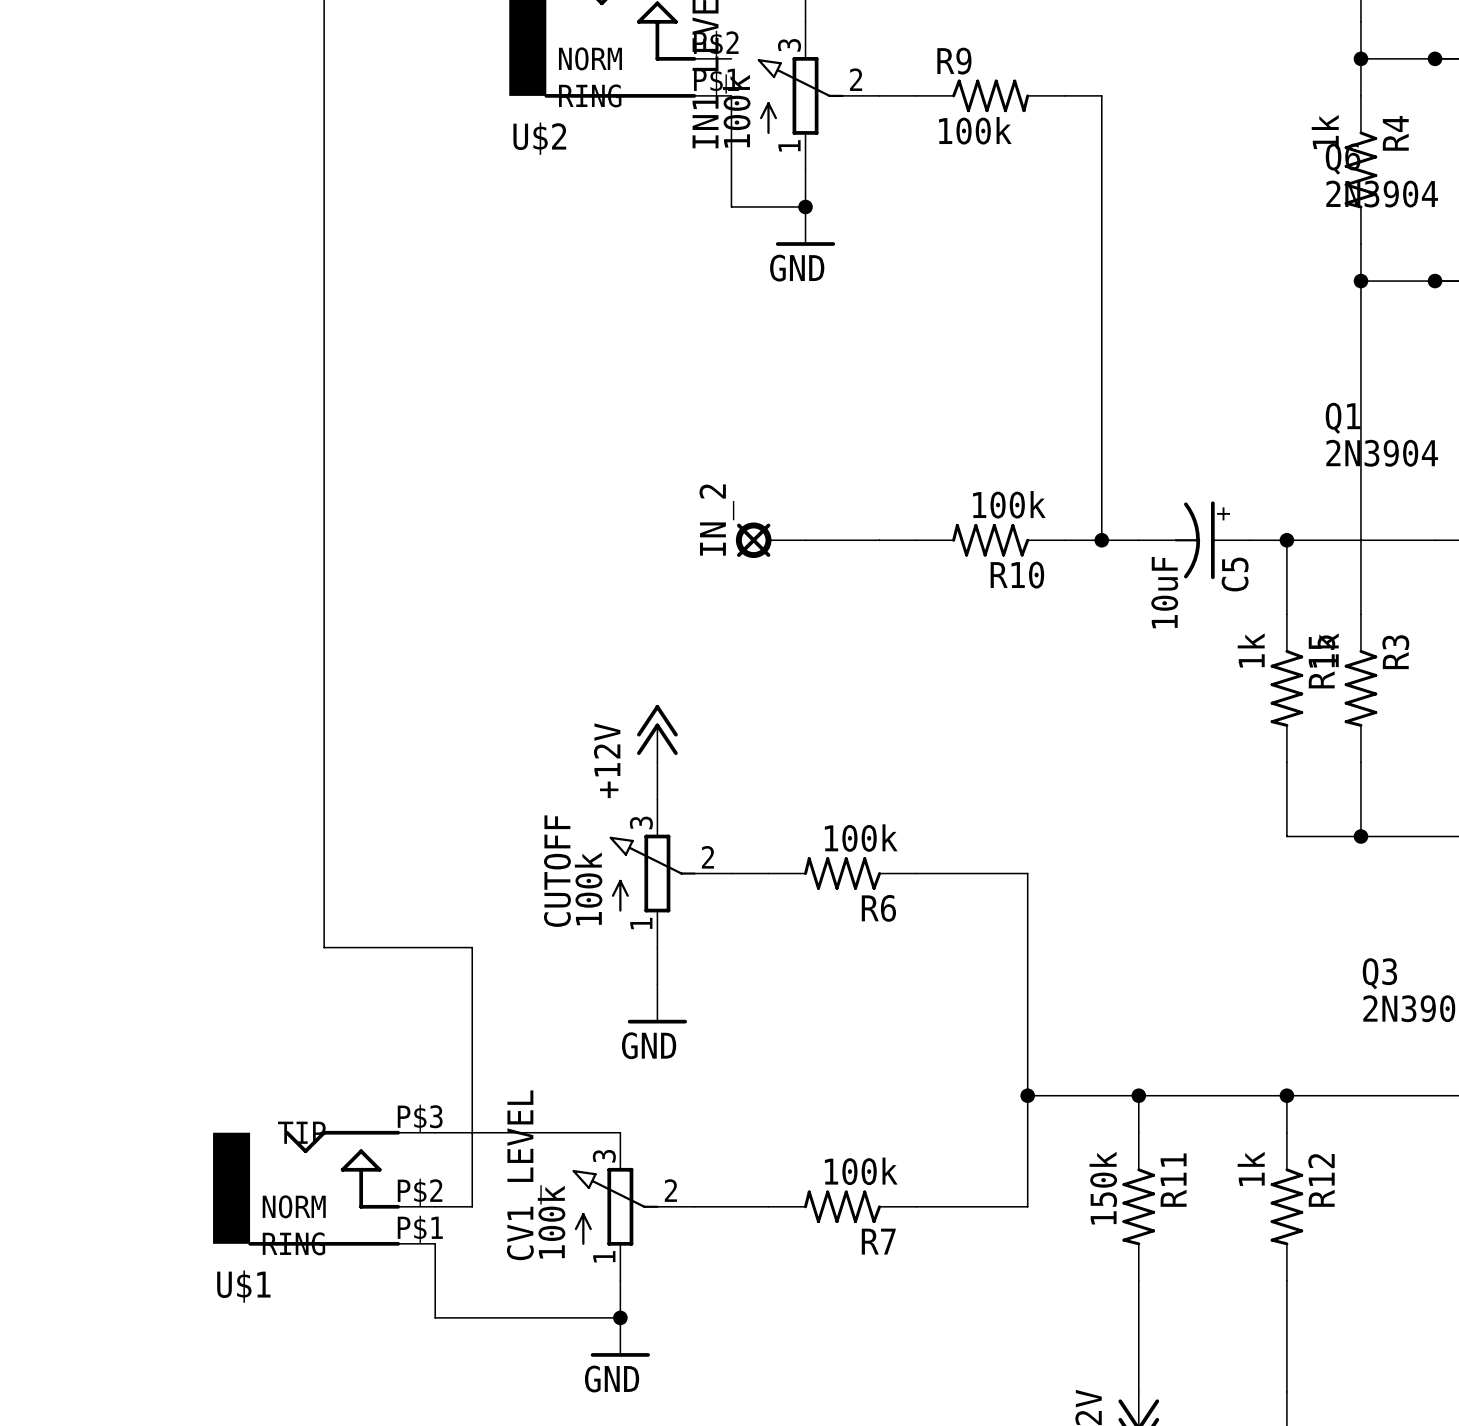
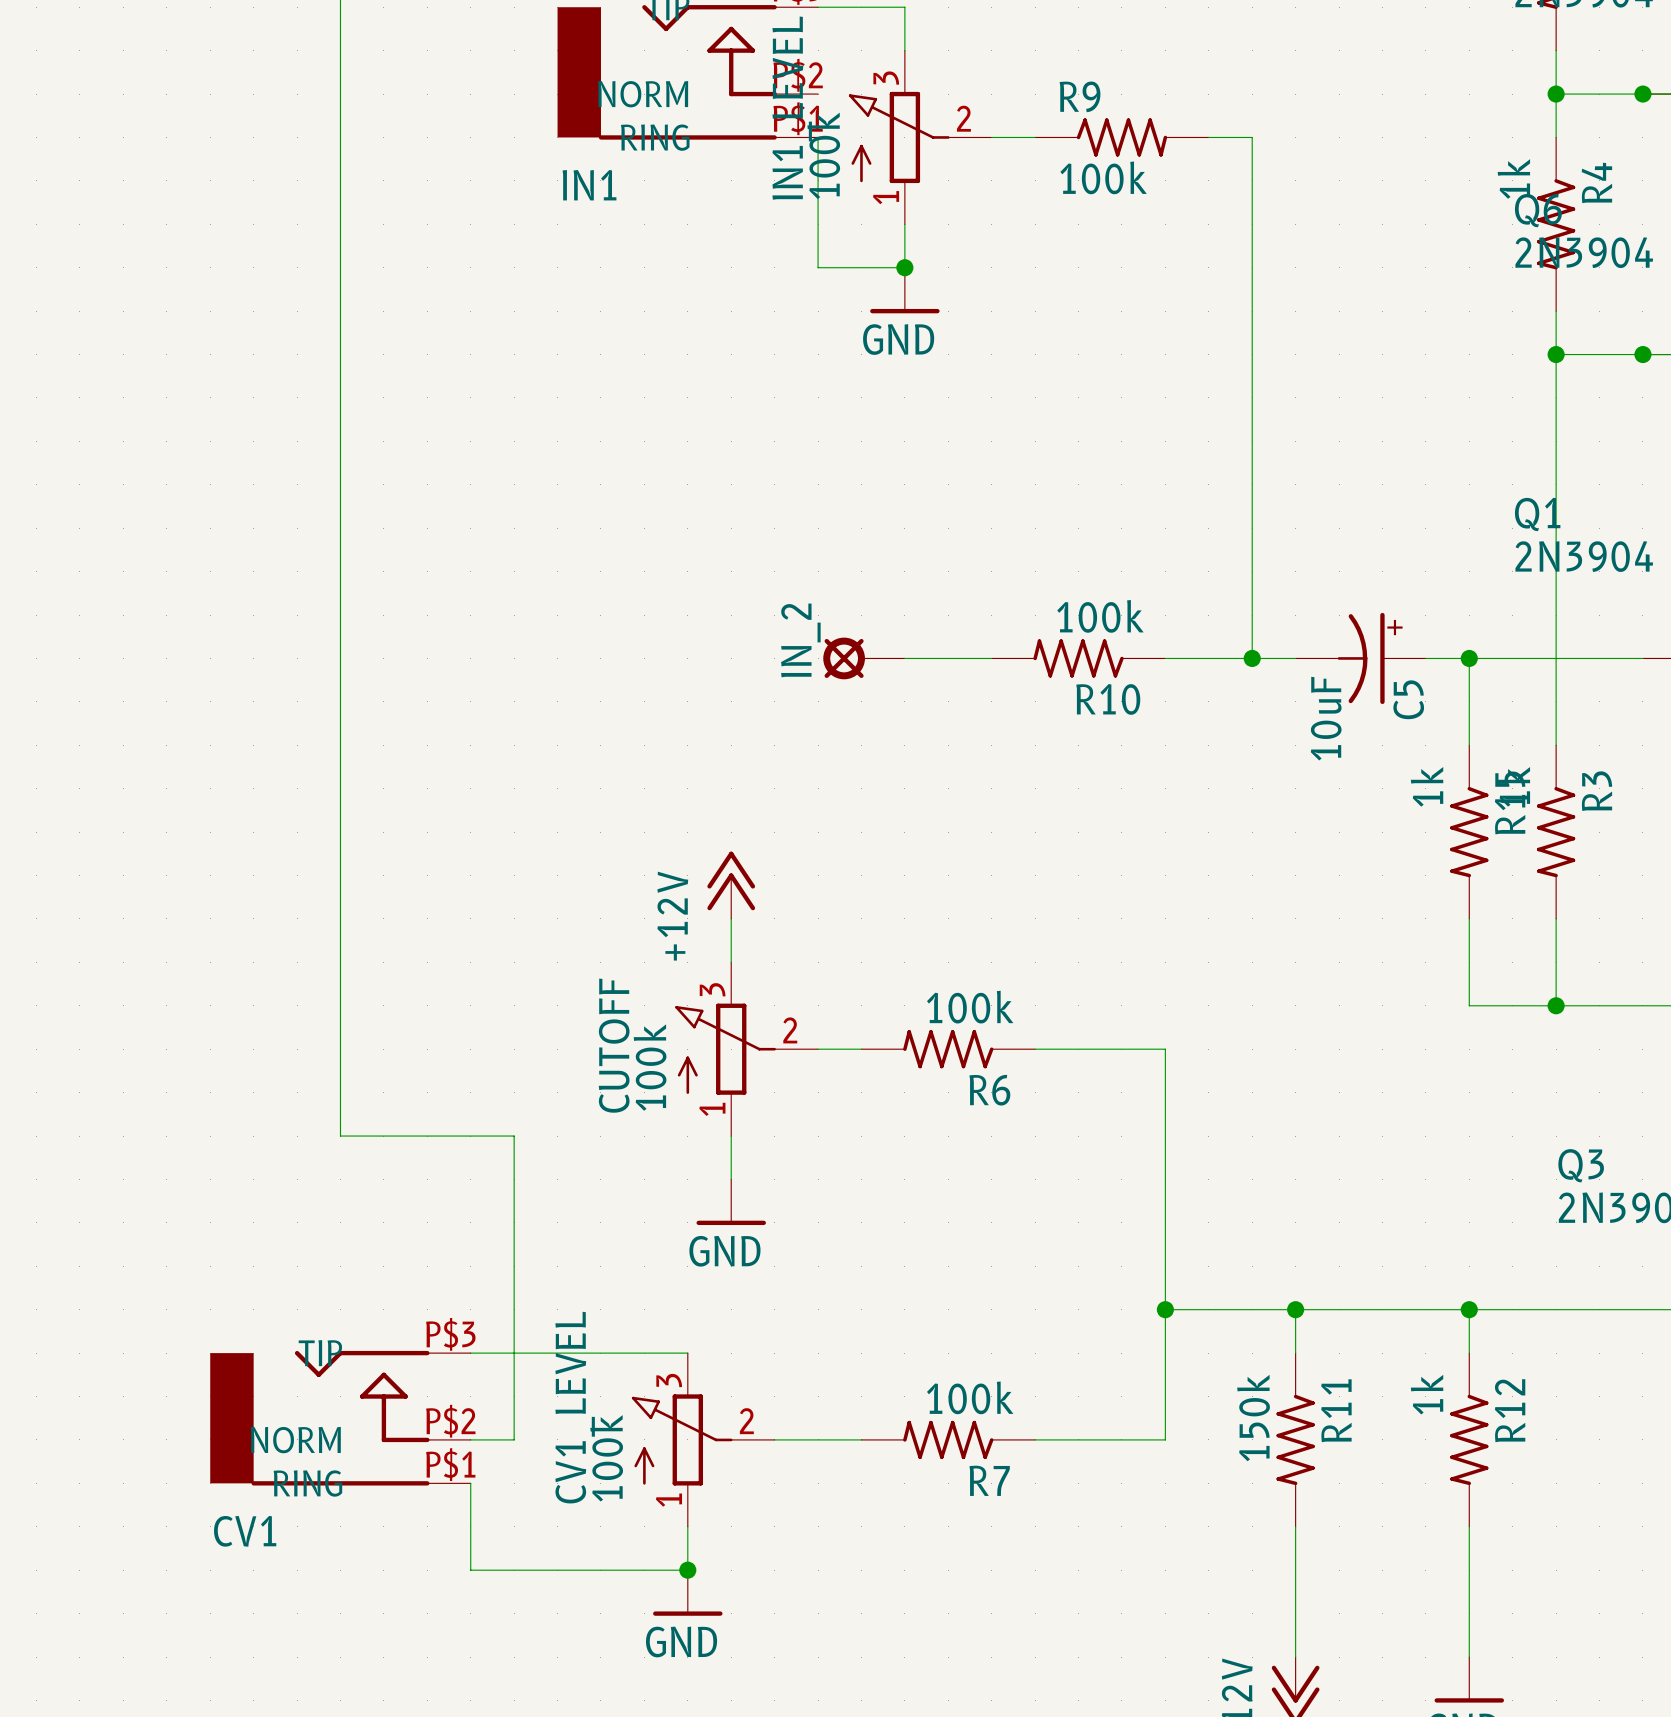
U$2 name: U$2 (539, 138) -> IN1 (589, 185)
R10 position: (990, 540) -> (1078, 658)
U$1 name: U$1 (243, 1286) -> CV1 (245, 1531)

